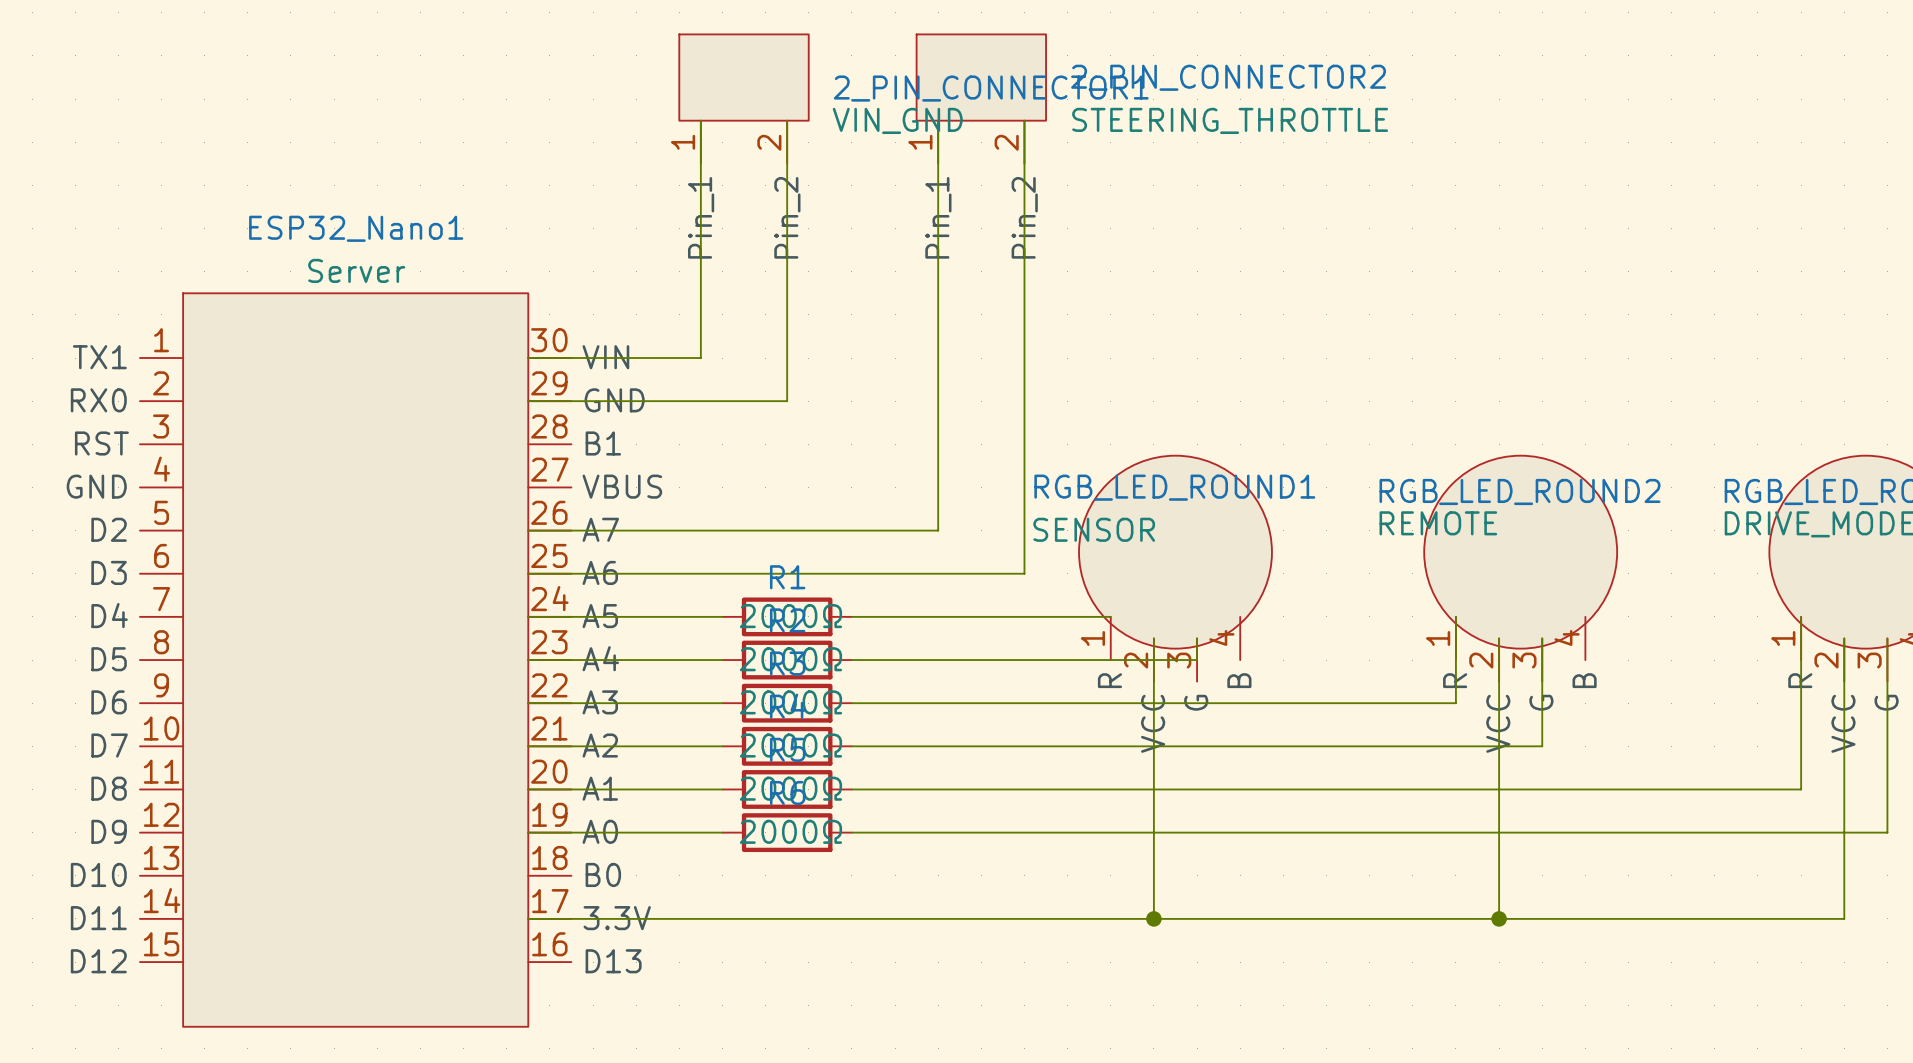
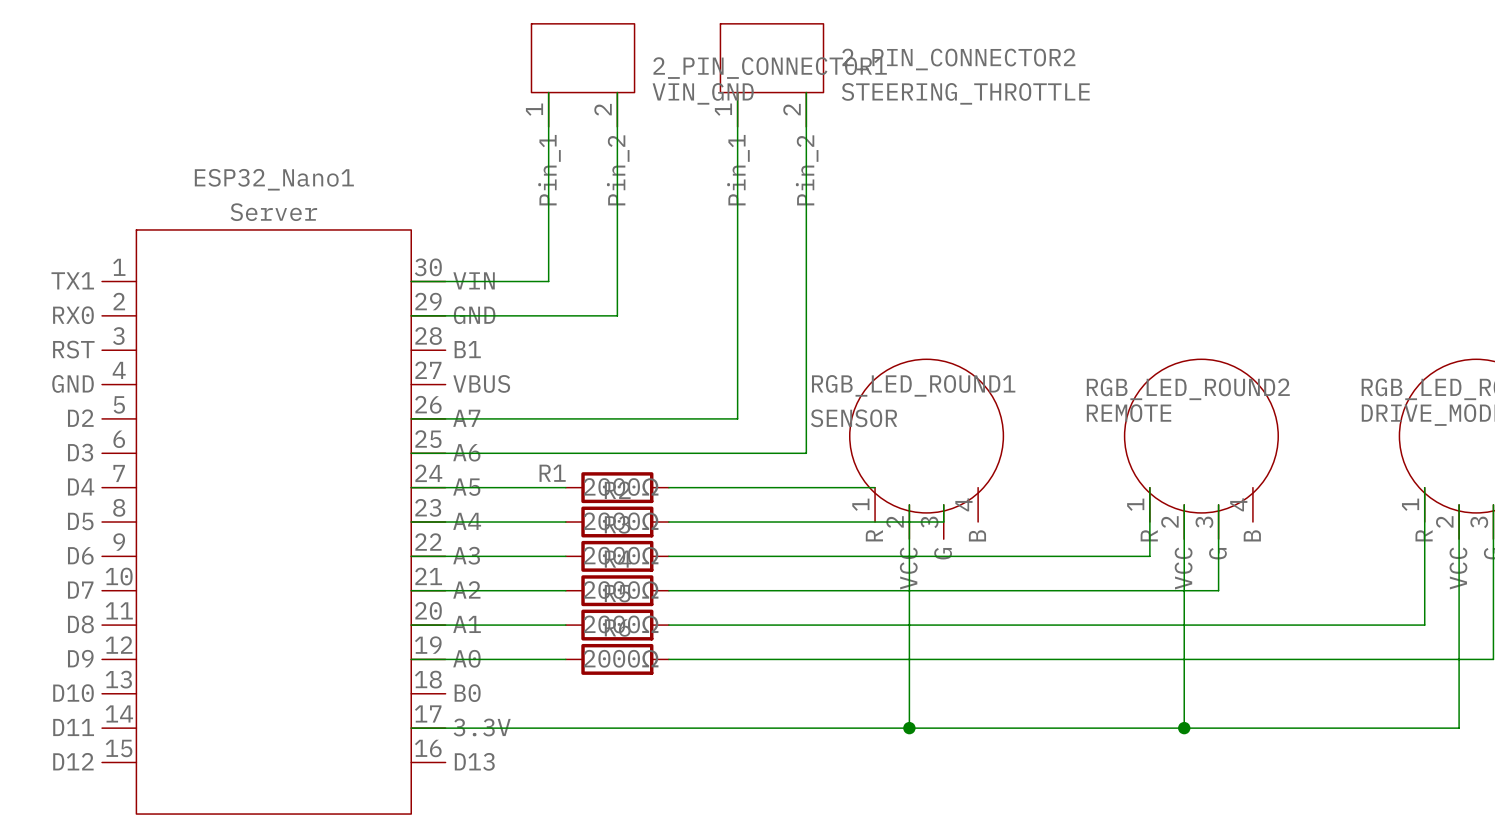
R1 name position: R1 (787, 577) -> R1 (552, 473)

